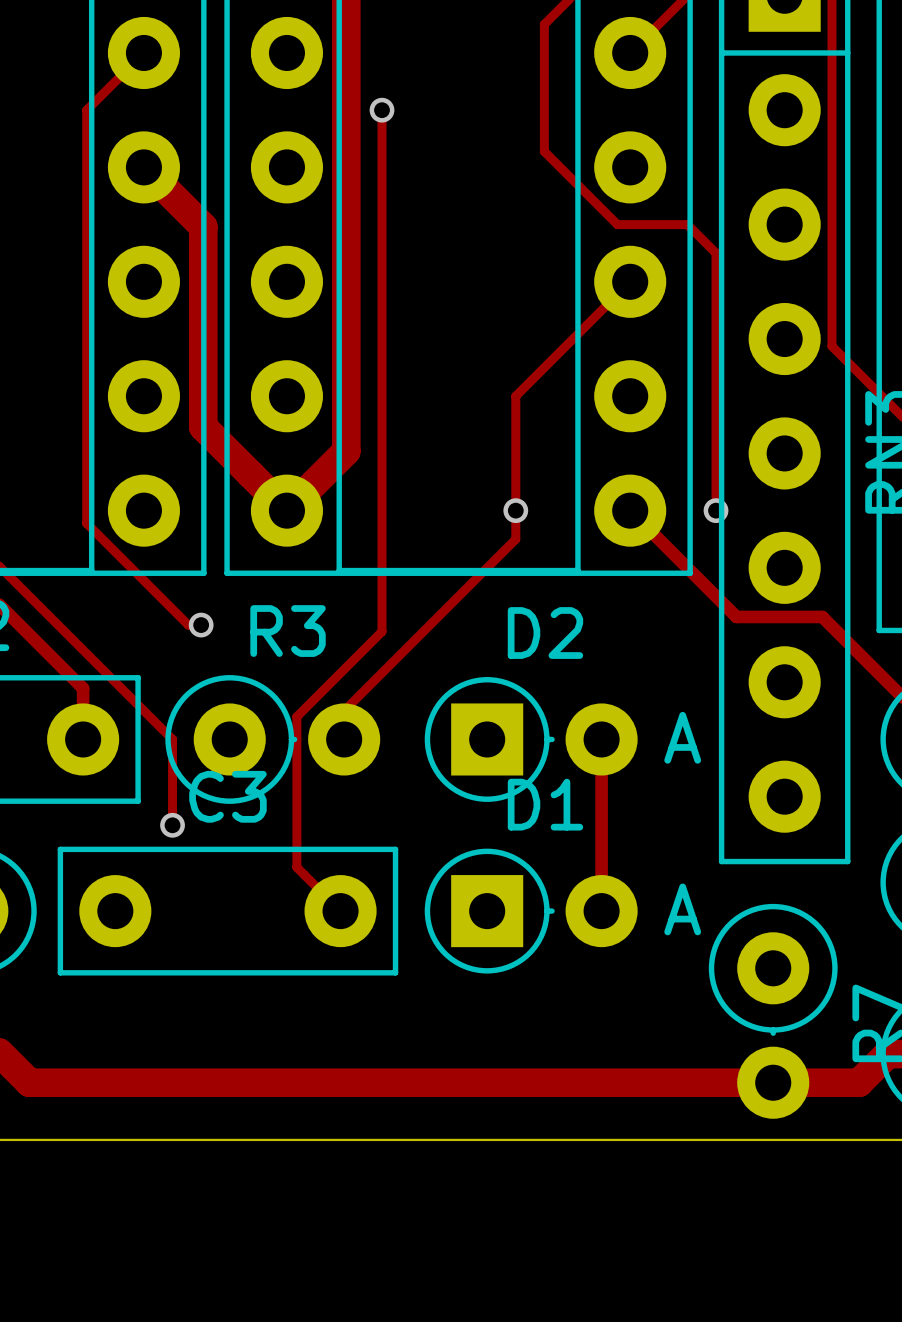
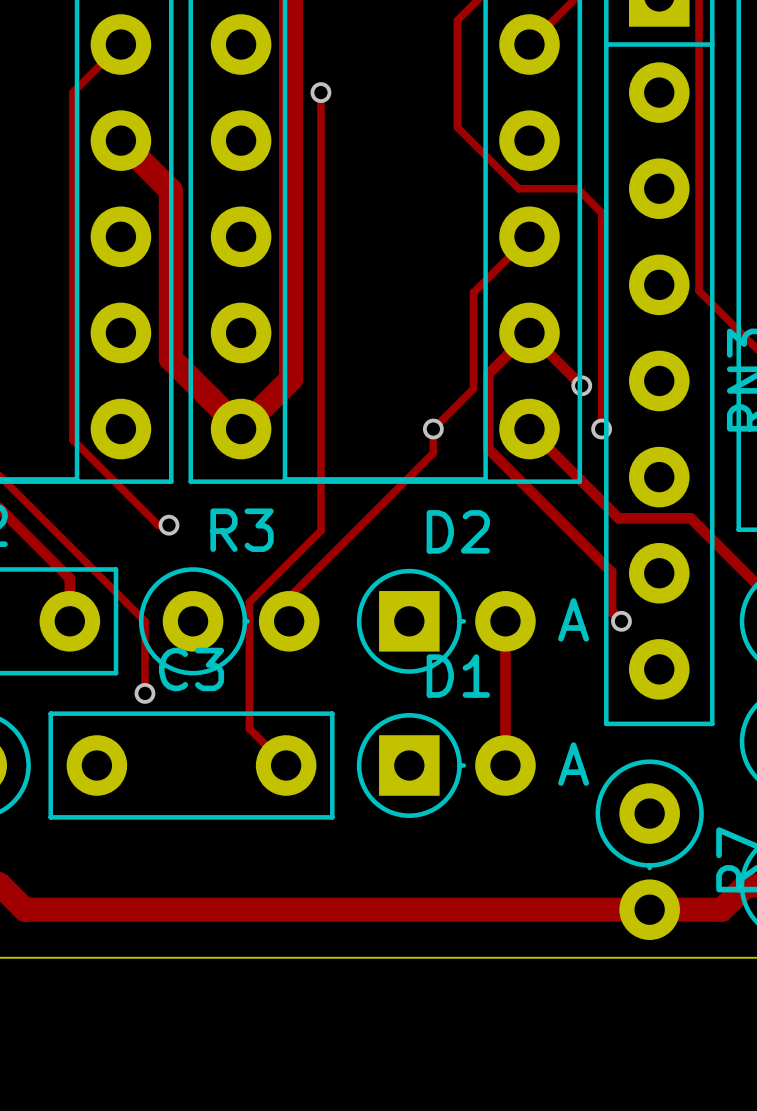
track: (563, 348) (515, 396) (515, 510) -> (473, 292) (473, 388) (433, 429)
track: none -> (529, 332) (488, 374) (488, 448) (611, 571) (611, 610) (621, 621)
track: none -> (529, 333) (581, 385)
via: none -> (581, 385)
via: none -> (621, 621)

